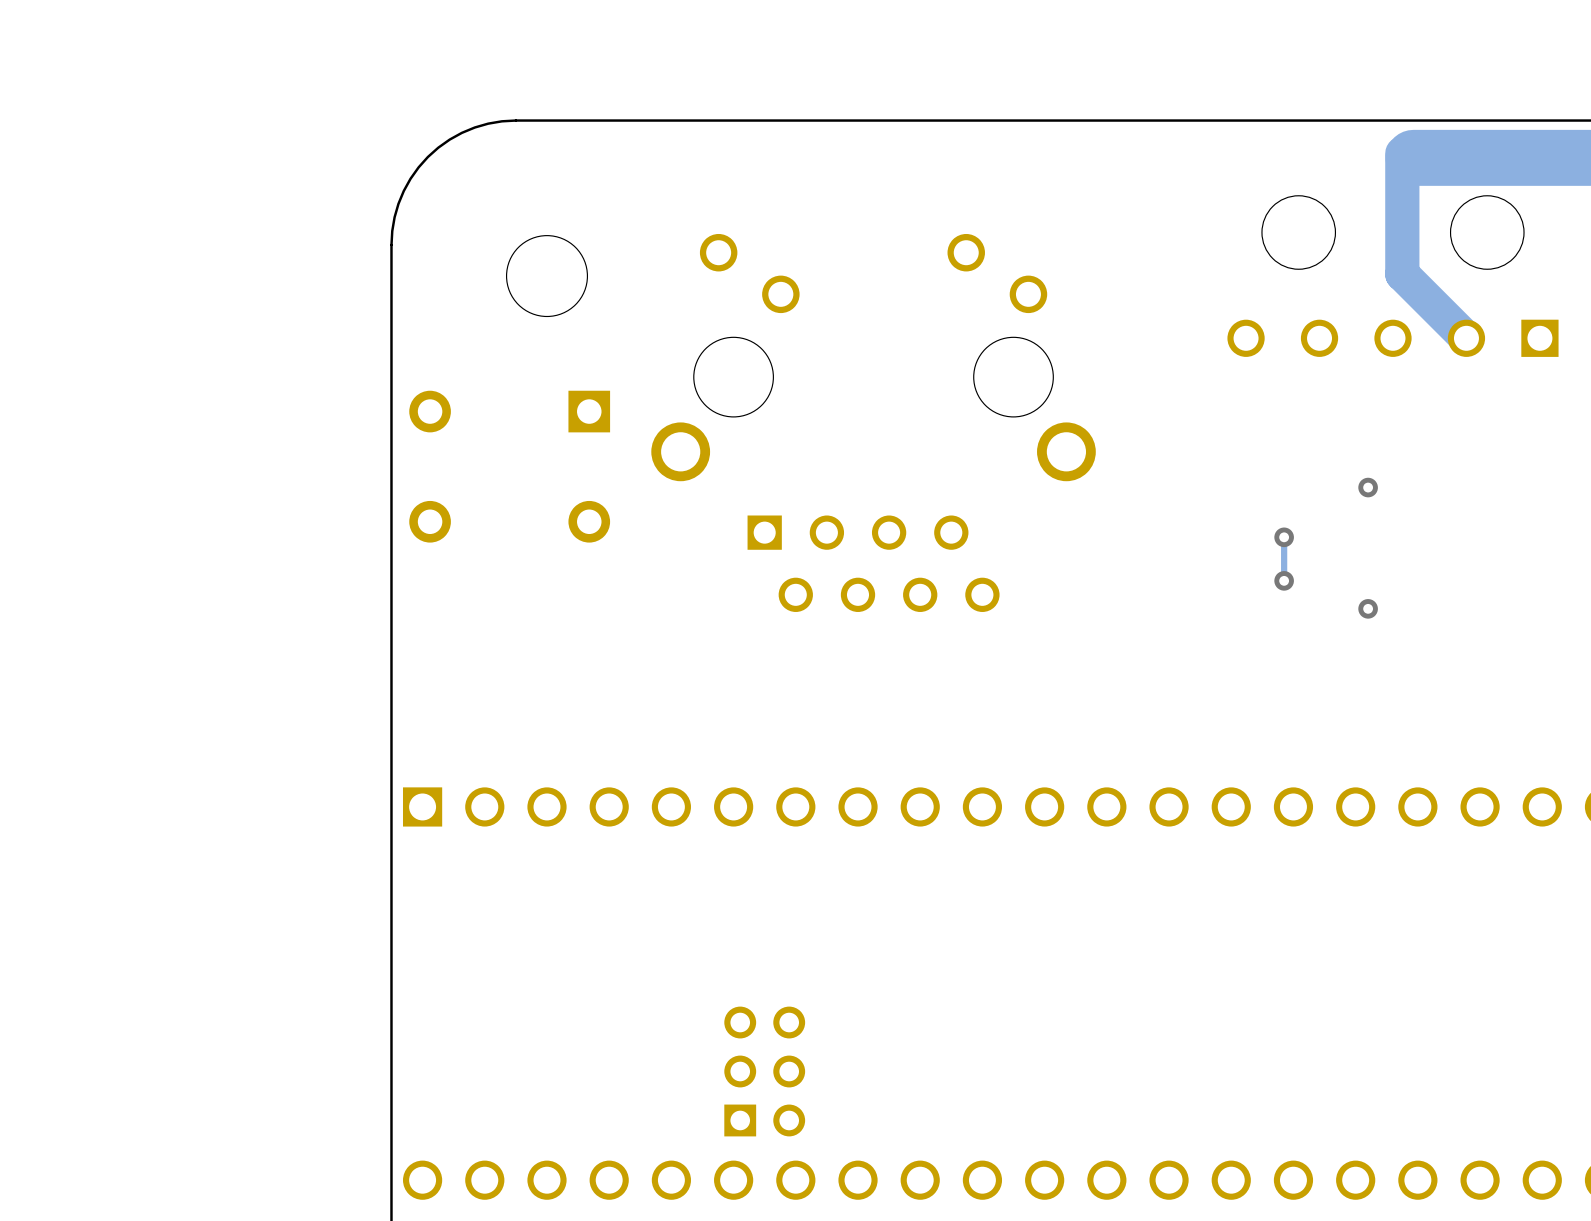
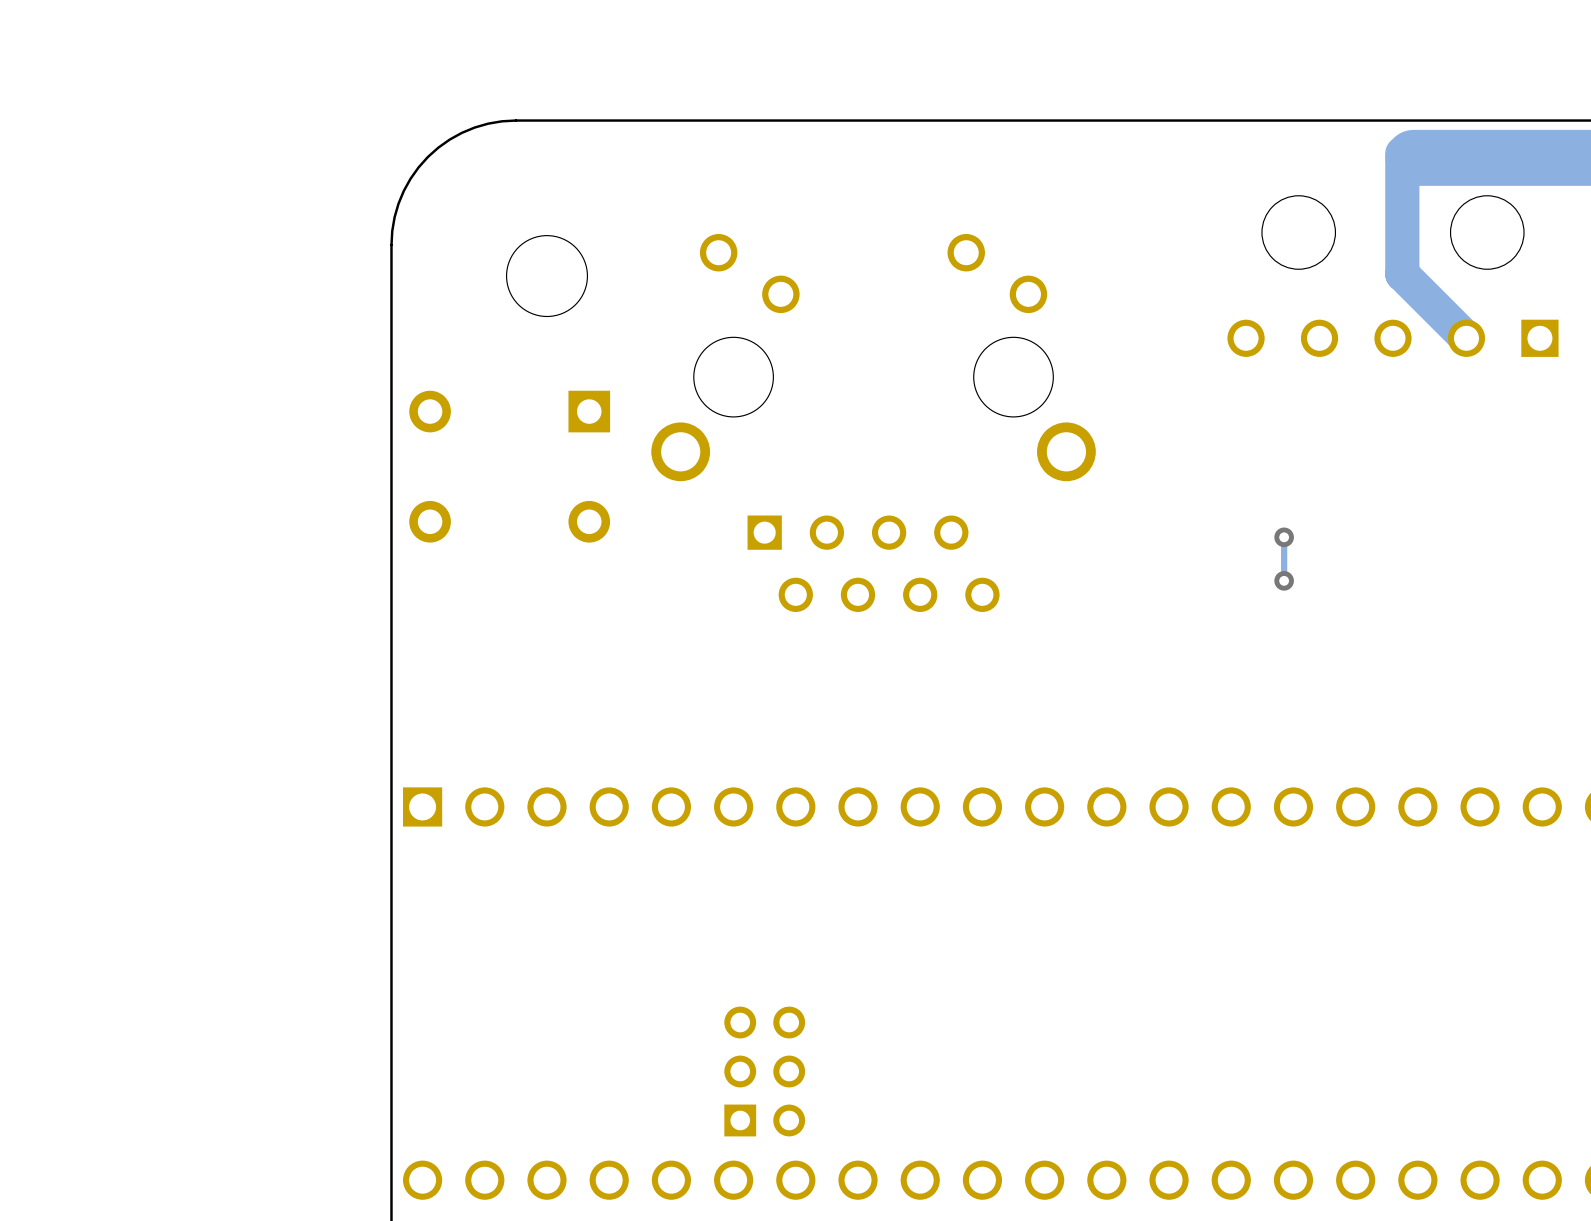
via: (1368, 487) -> none
via: (1368, 608) -> none

